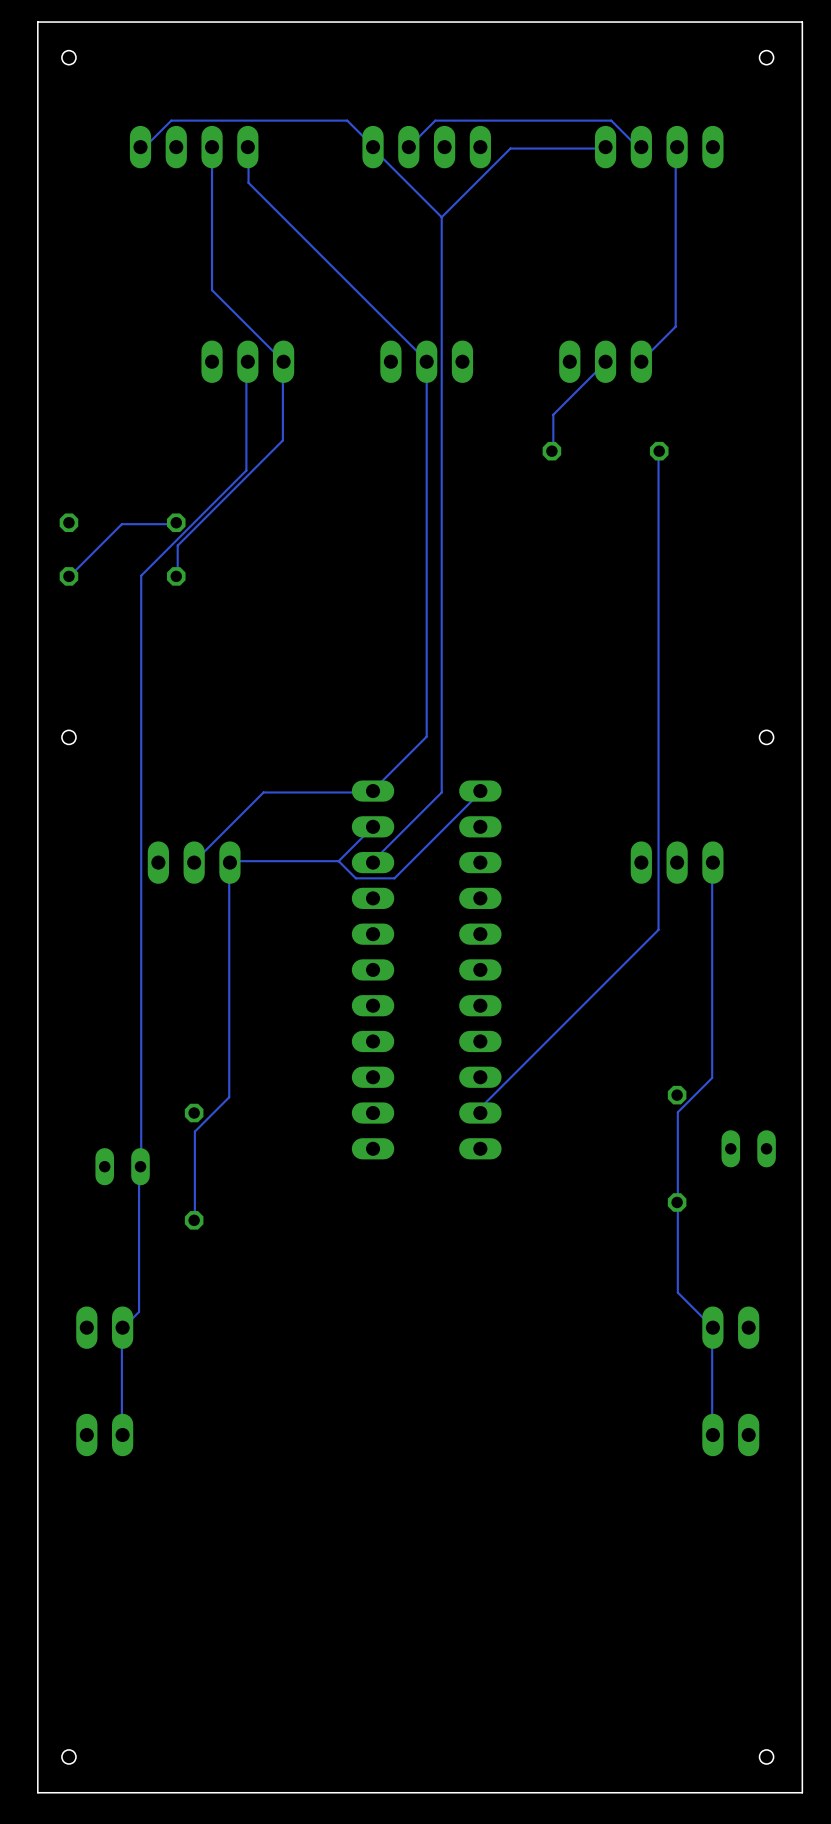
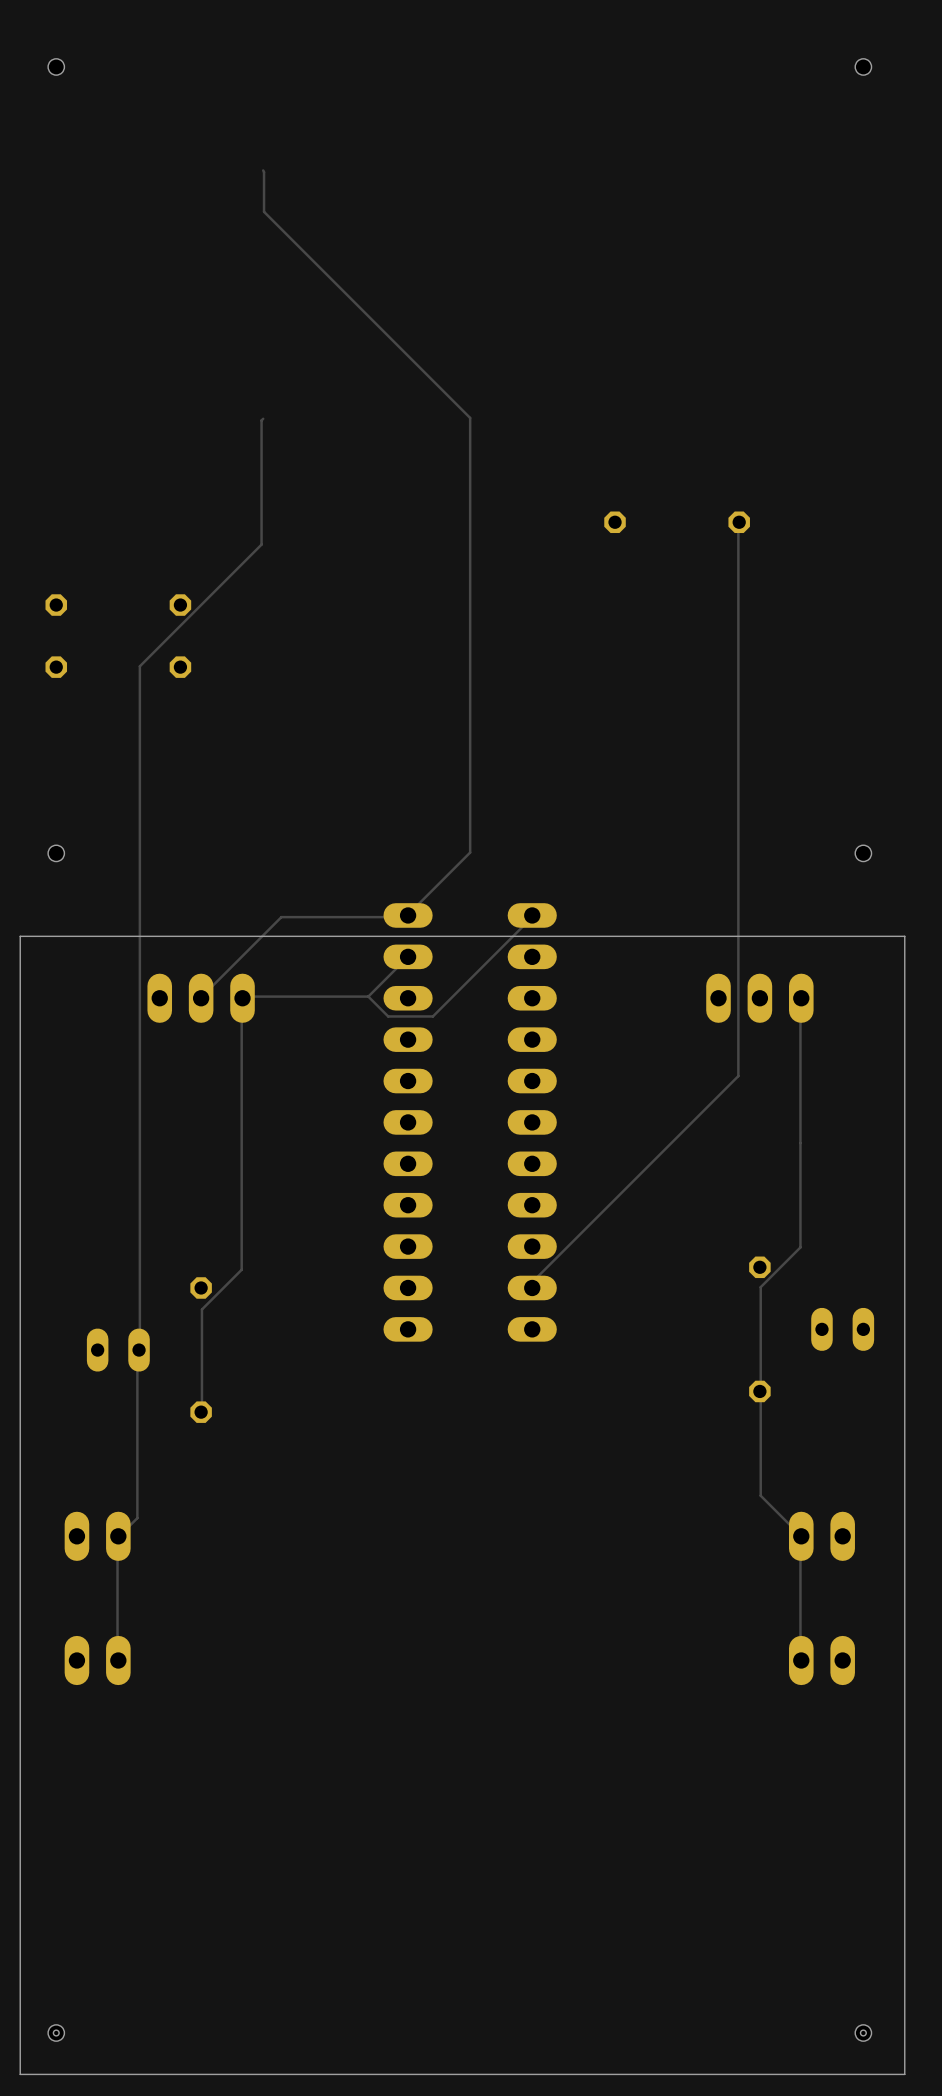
track: (140, 147) (145, 146) (171, 120) (347, 120) (441, 217) -> none
part: (194, 147) -> none
track: (212, 147) (212, 290) (283, 361) (282, 440) (177, 545) (176, 576) -> none
part: (426, 147) -> none
track: (605, 147) (510, 148) (441, 217) -> none
track: (641, 147) (637, 146) (611, 120) (435, 120) (408, 147) -> none
part: (659, 147) -> none
track: (677, 147) (675, 326) (641, 361) -> none
track: (441, 217) (441, 792) (373, 862) -> none
part: (247, 361) -> none
part: (426, 361) -> none
track: (605, 361) (553, 414) (551, 451) -> none
part: (605, 361) -> none
track: (176, 522) (121, 524) (68, 576) -> none
board edge: (802, 809) (802, 22) (37, 22) (37, 809) -> (904, 936) (20, 936)
hole: none -> (56, 2033)
hole: none -> (863, 2033)

